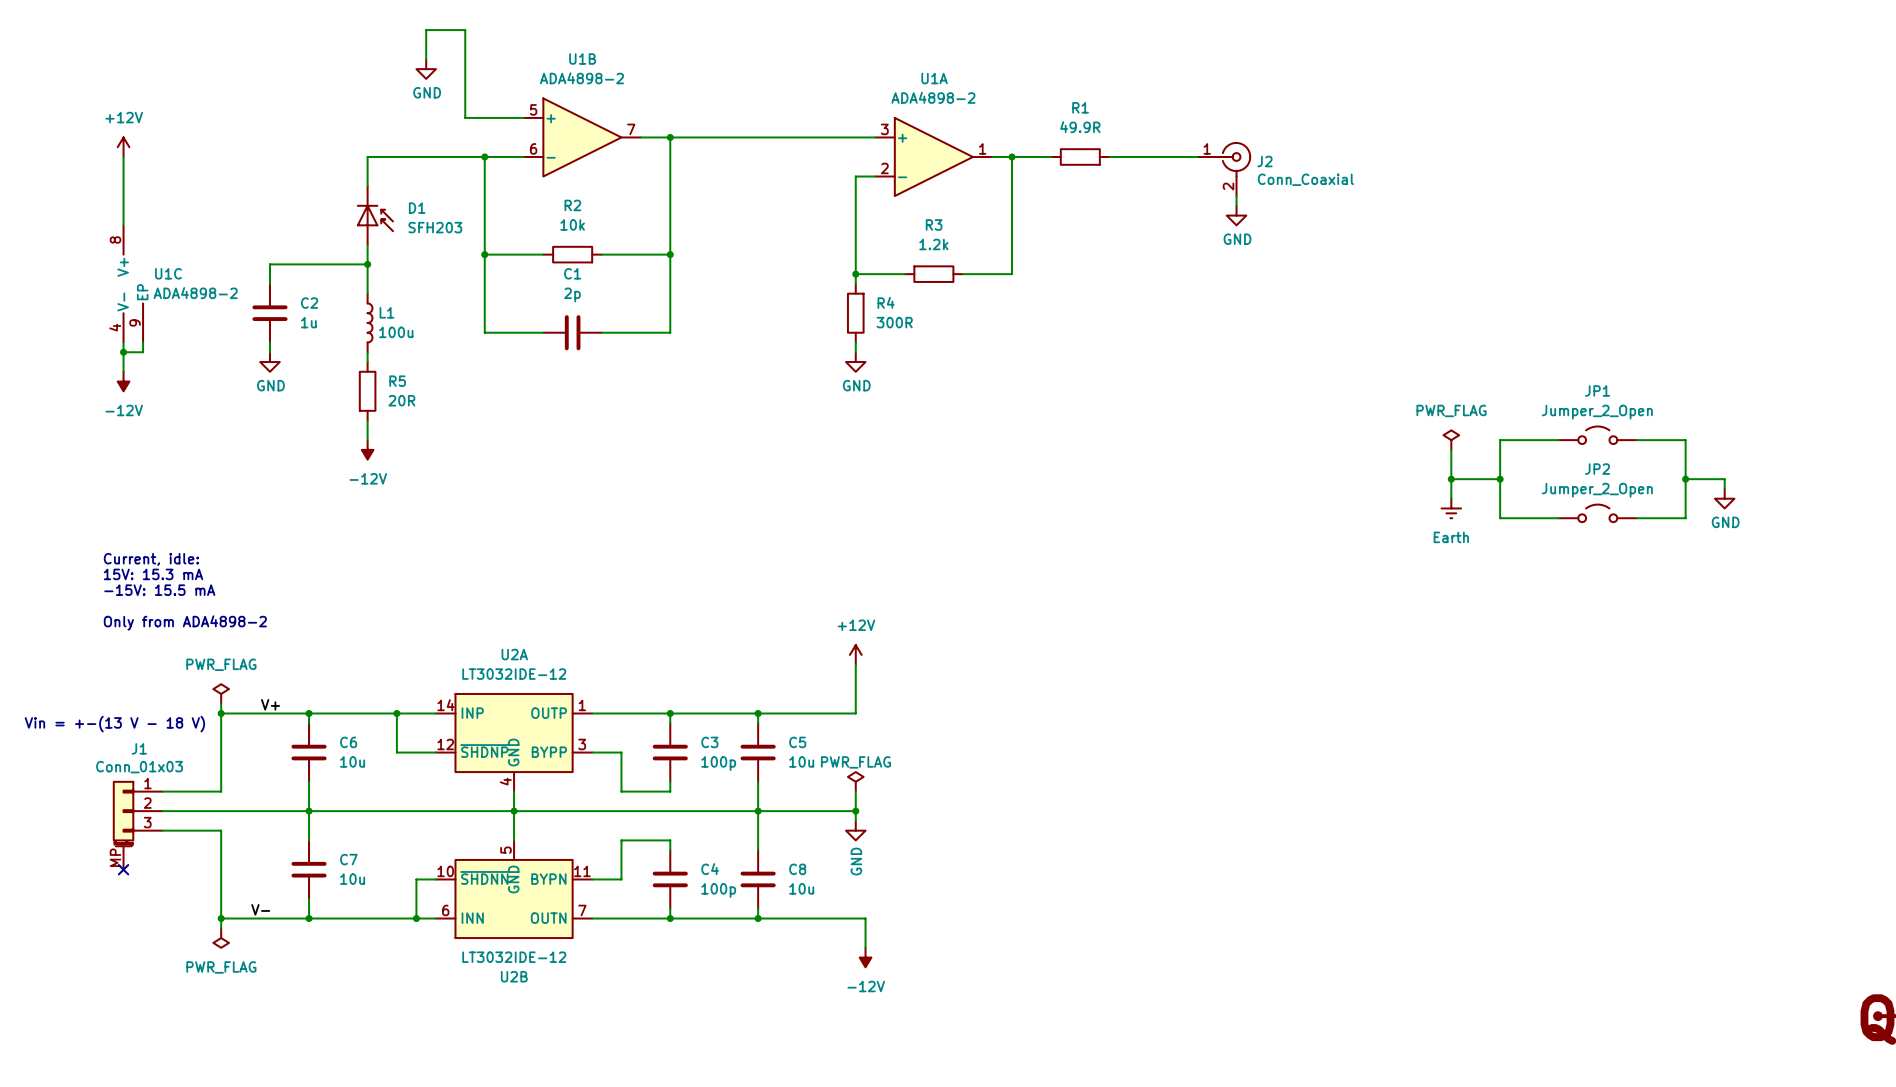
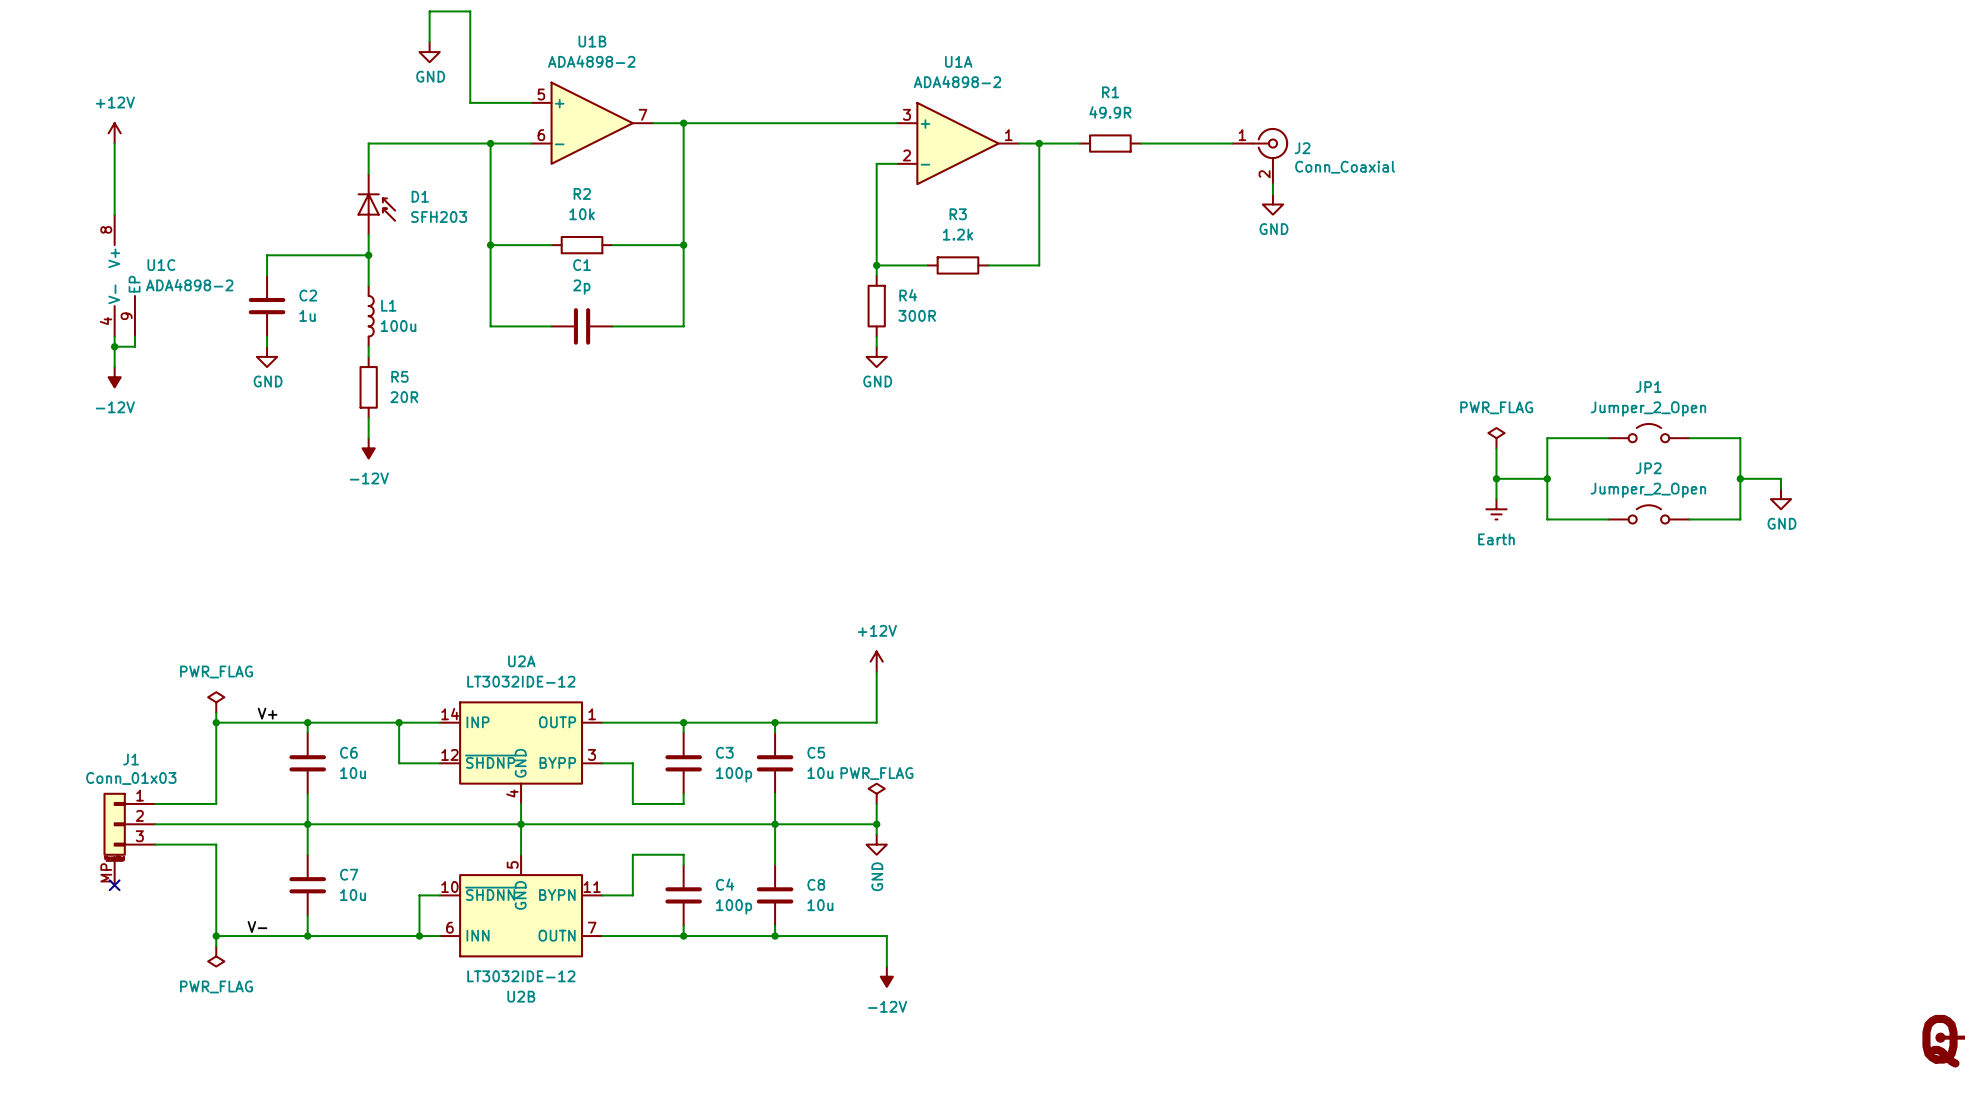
text: Current, idle: (151, 559) -> none
text: 15V: 15.3 mA (153, 574) -> none
text: -15V: 15.5 mA (159, 590) -> none
text: Only from ADA4898-2 (185, 622) -> none
text: Vin = +-(13 V - 18 V) (114, 724) -> none

